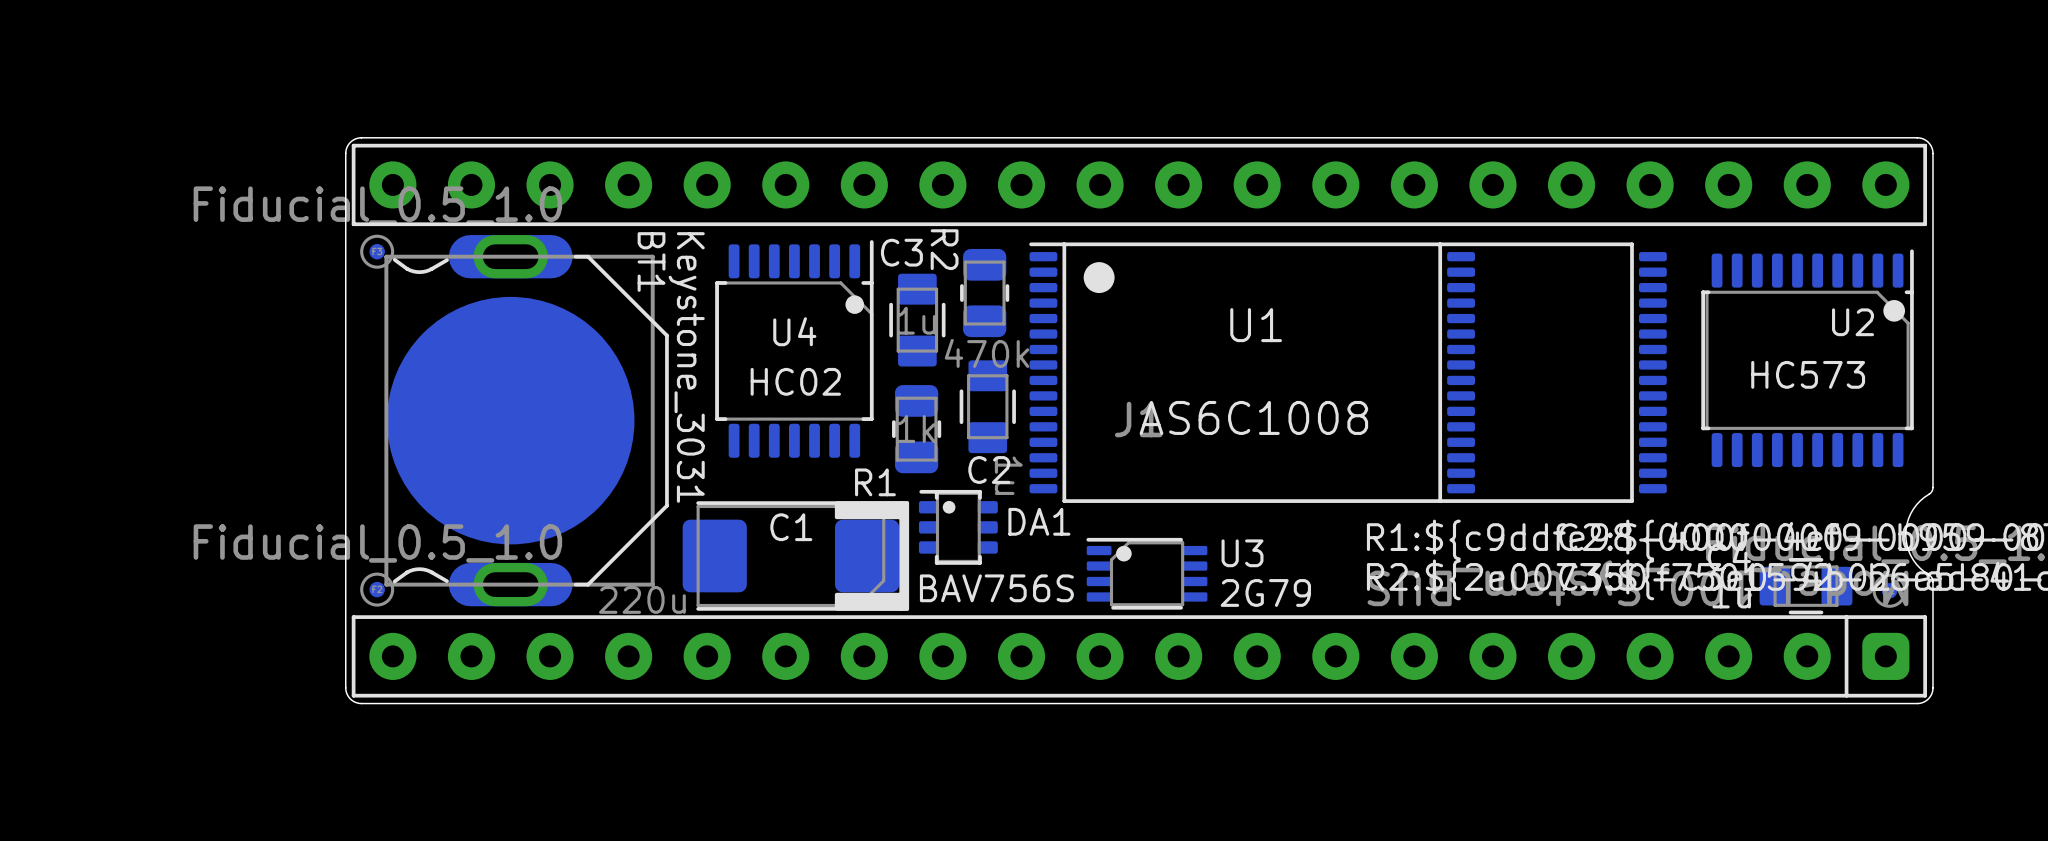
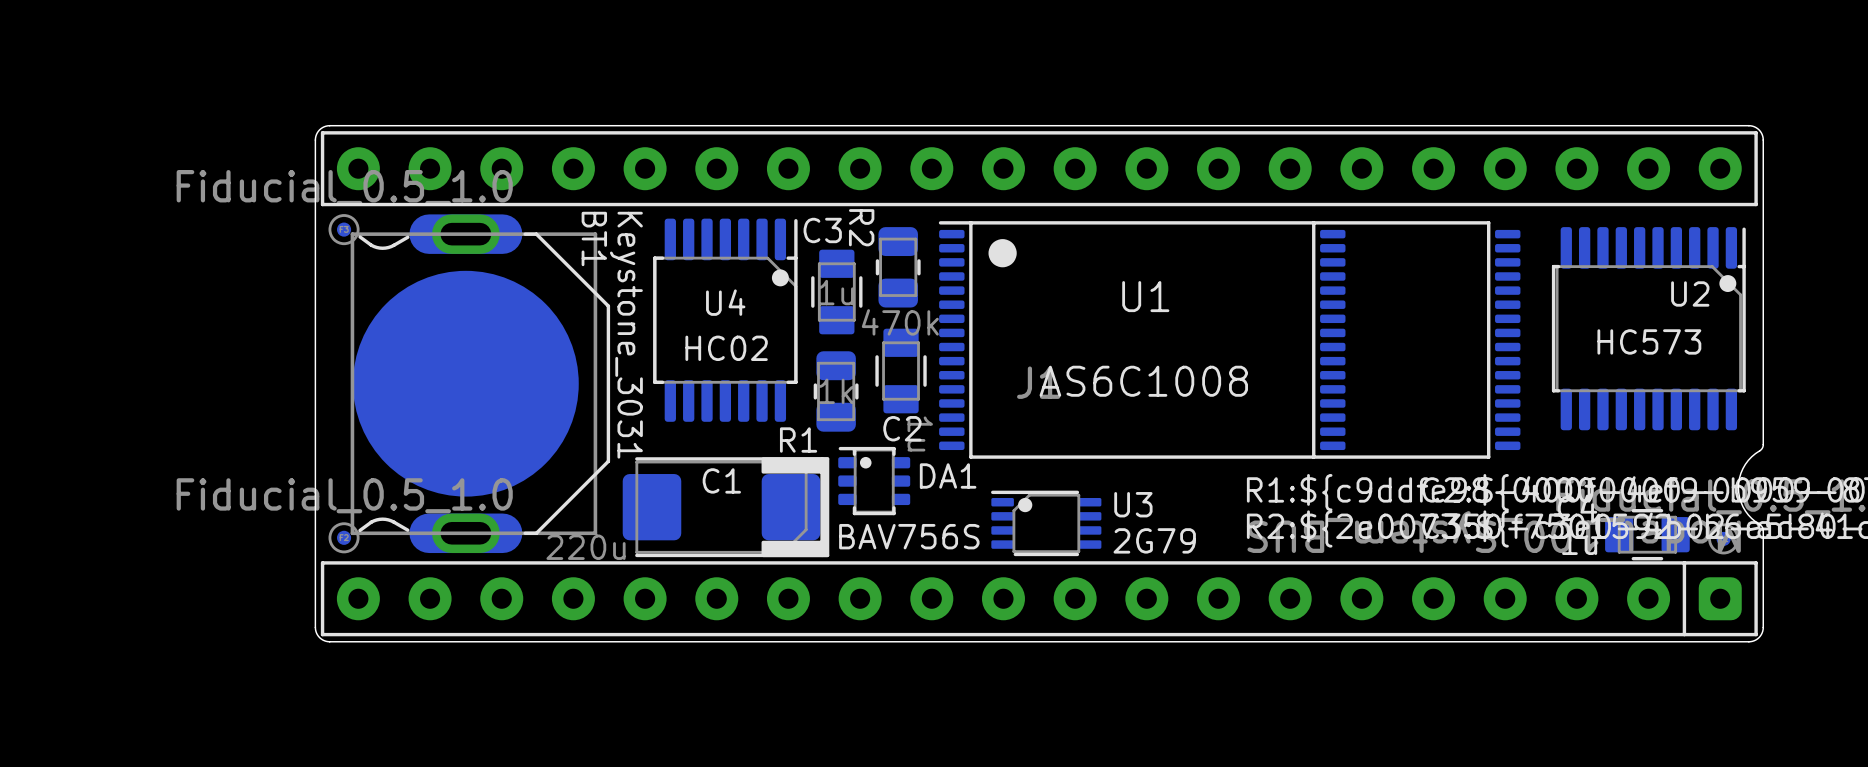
U4 footprint: [715, 240, 874, 458] -> [653, 218, 798, 422]
U2 footprint: [1701, 249, 1914, 468] -> [1551, 227, 1746, 431]

